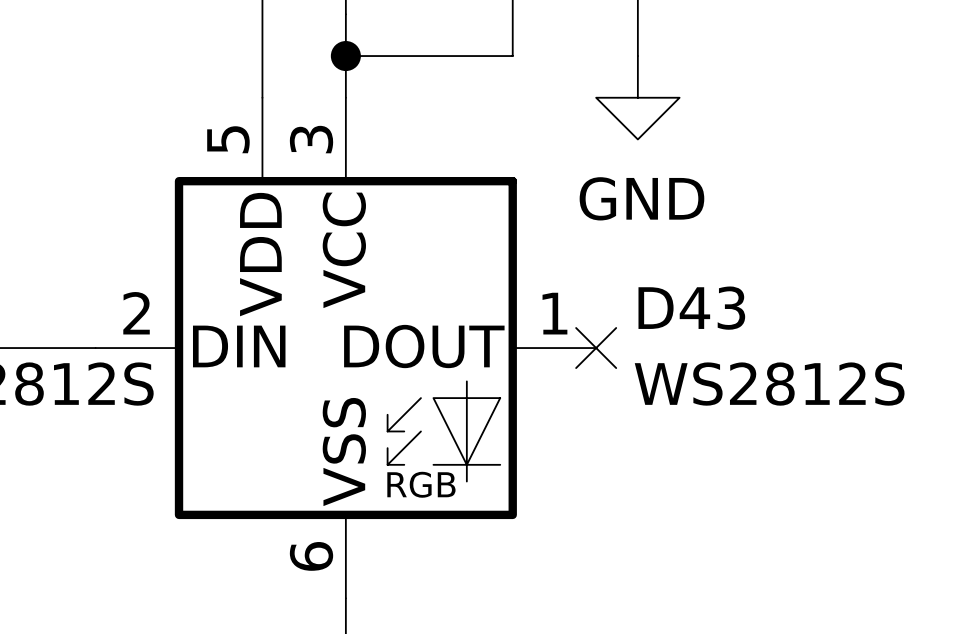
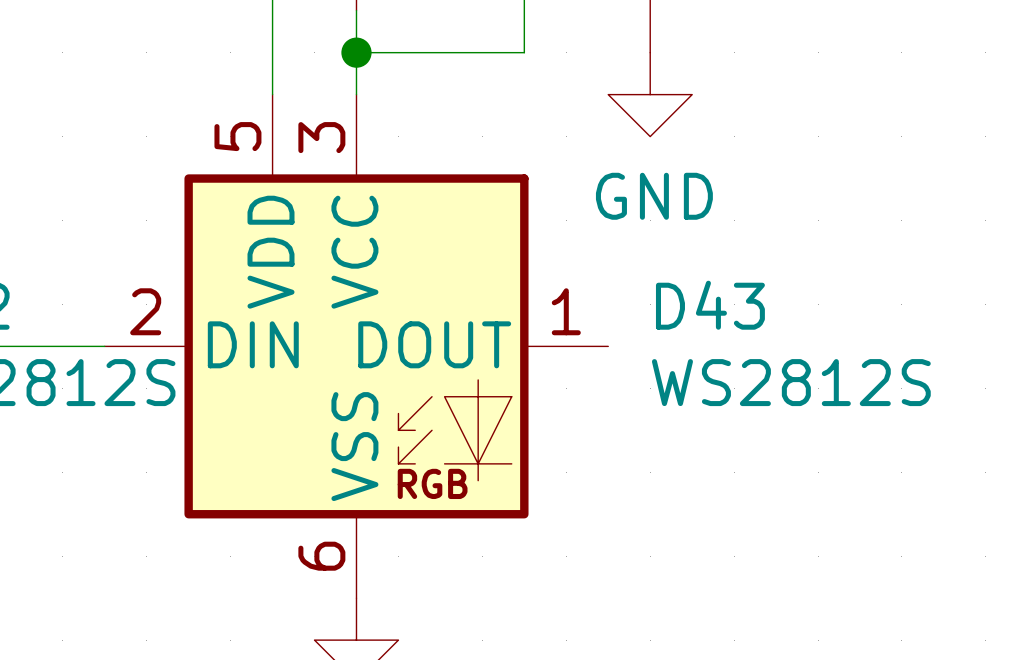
no-connect mark: (596, 348) -> none

